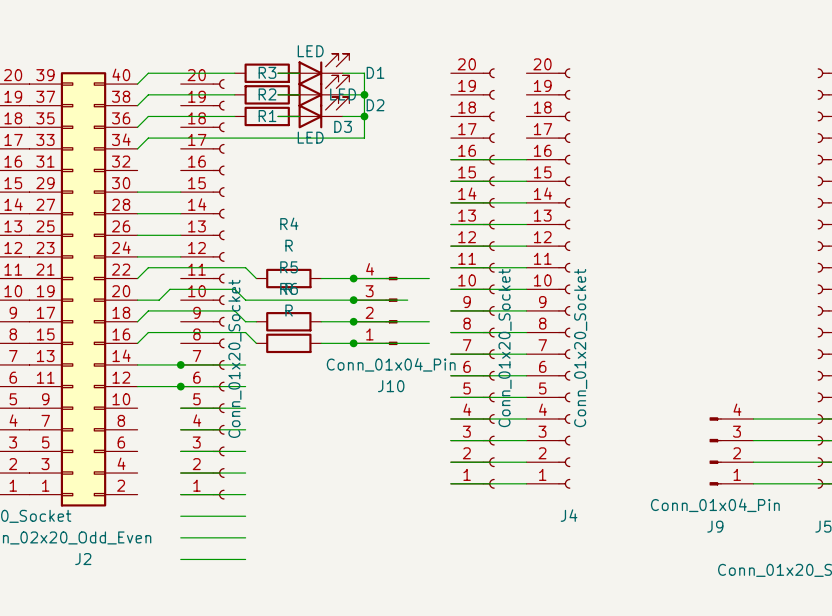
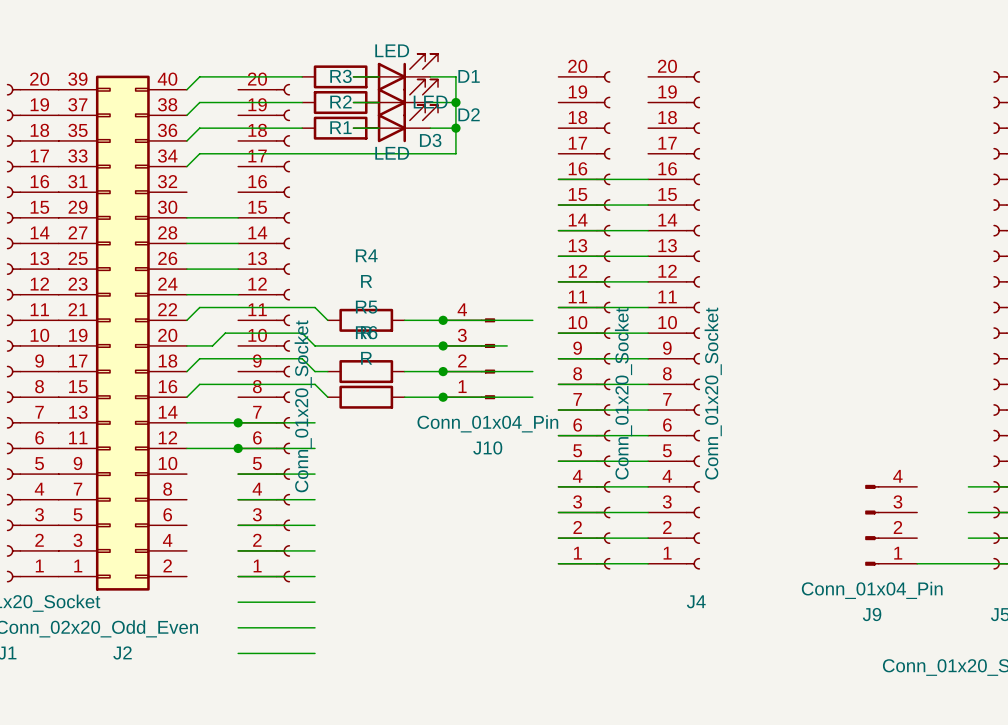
wire: (753, 418) (796, 418) -> none
wire: (753, 440) (796, 440) -> none
wire: (753, 462) (796, 462) -> none

